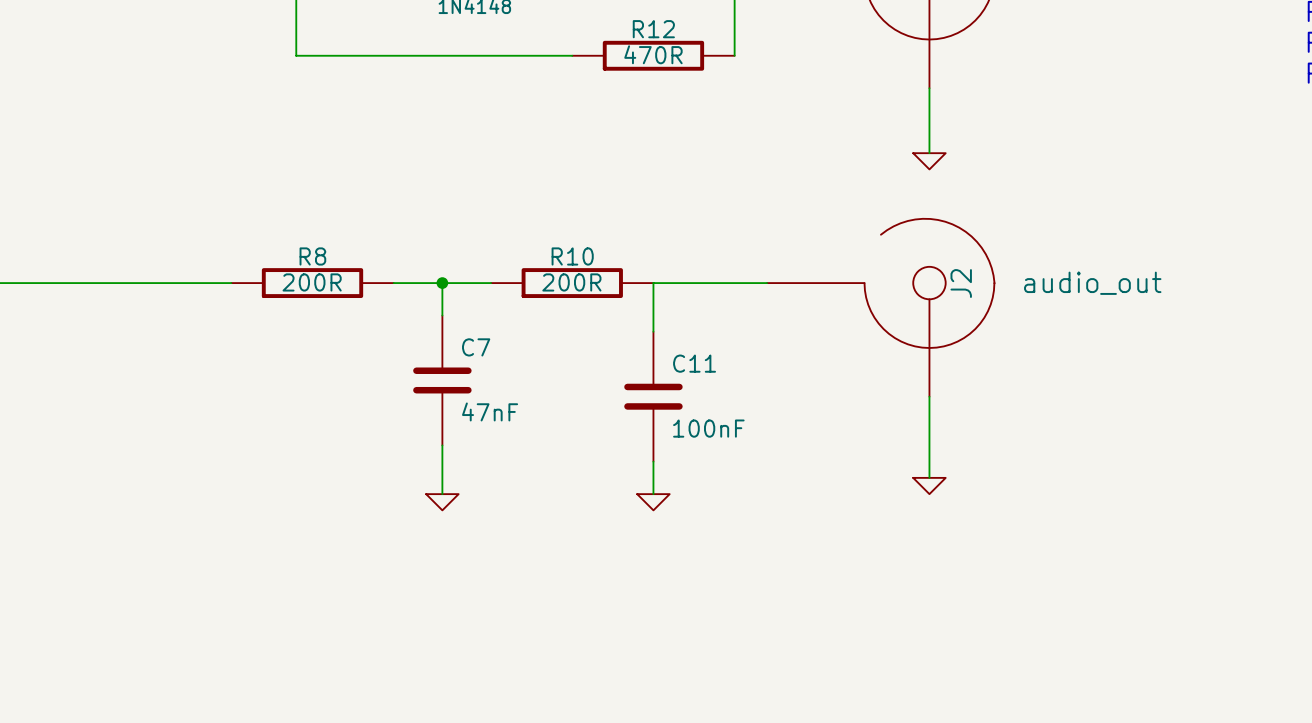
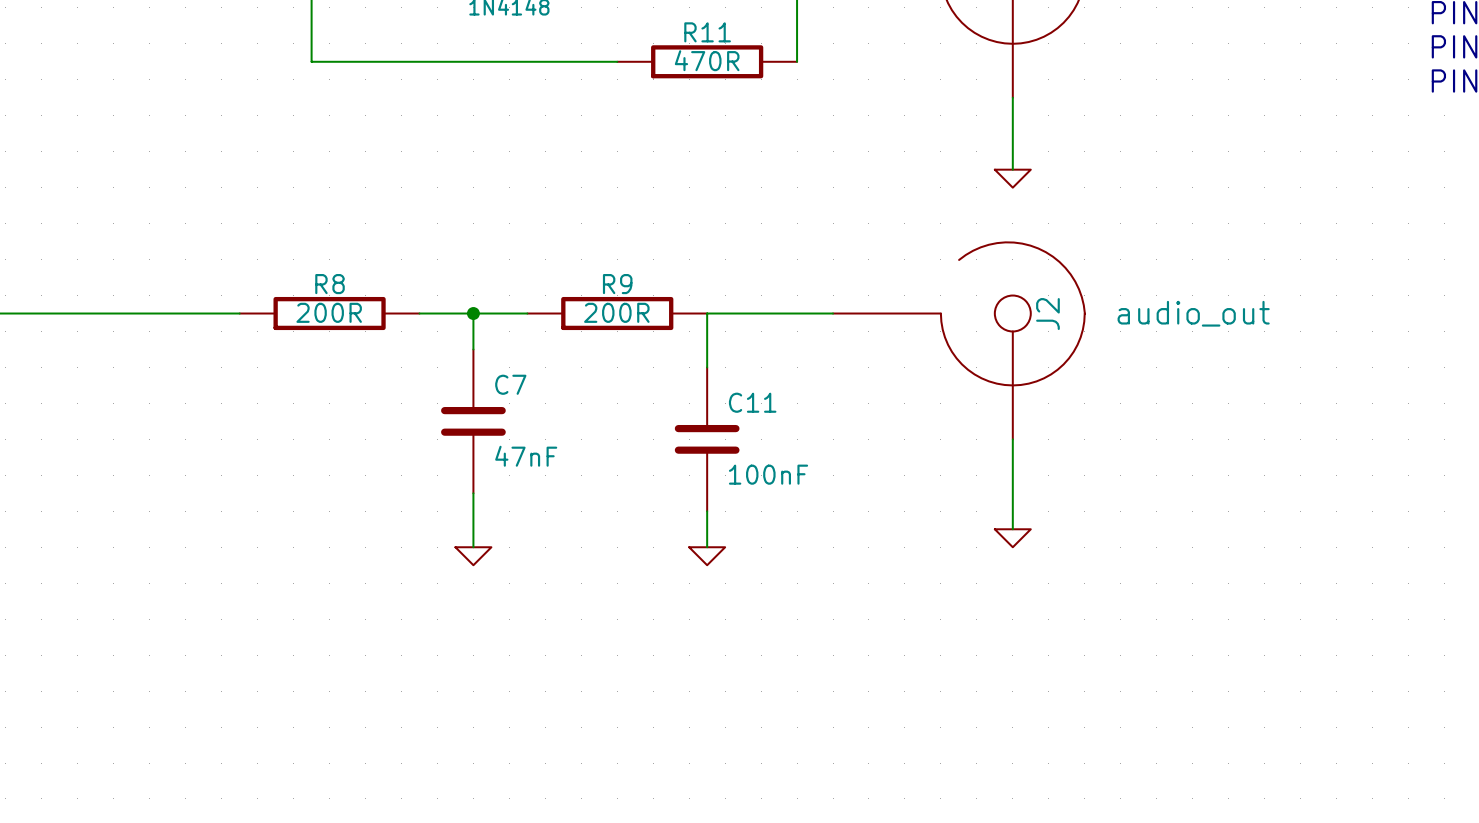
R12 name: R12 (653, 29) -> R11 (707, 32)
R10 name: R10 (572, 256) -> R9 (617, 284)

